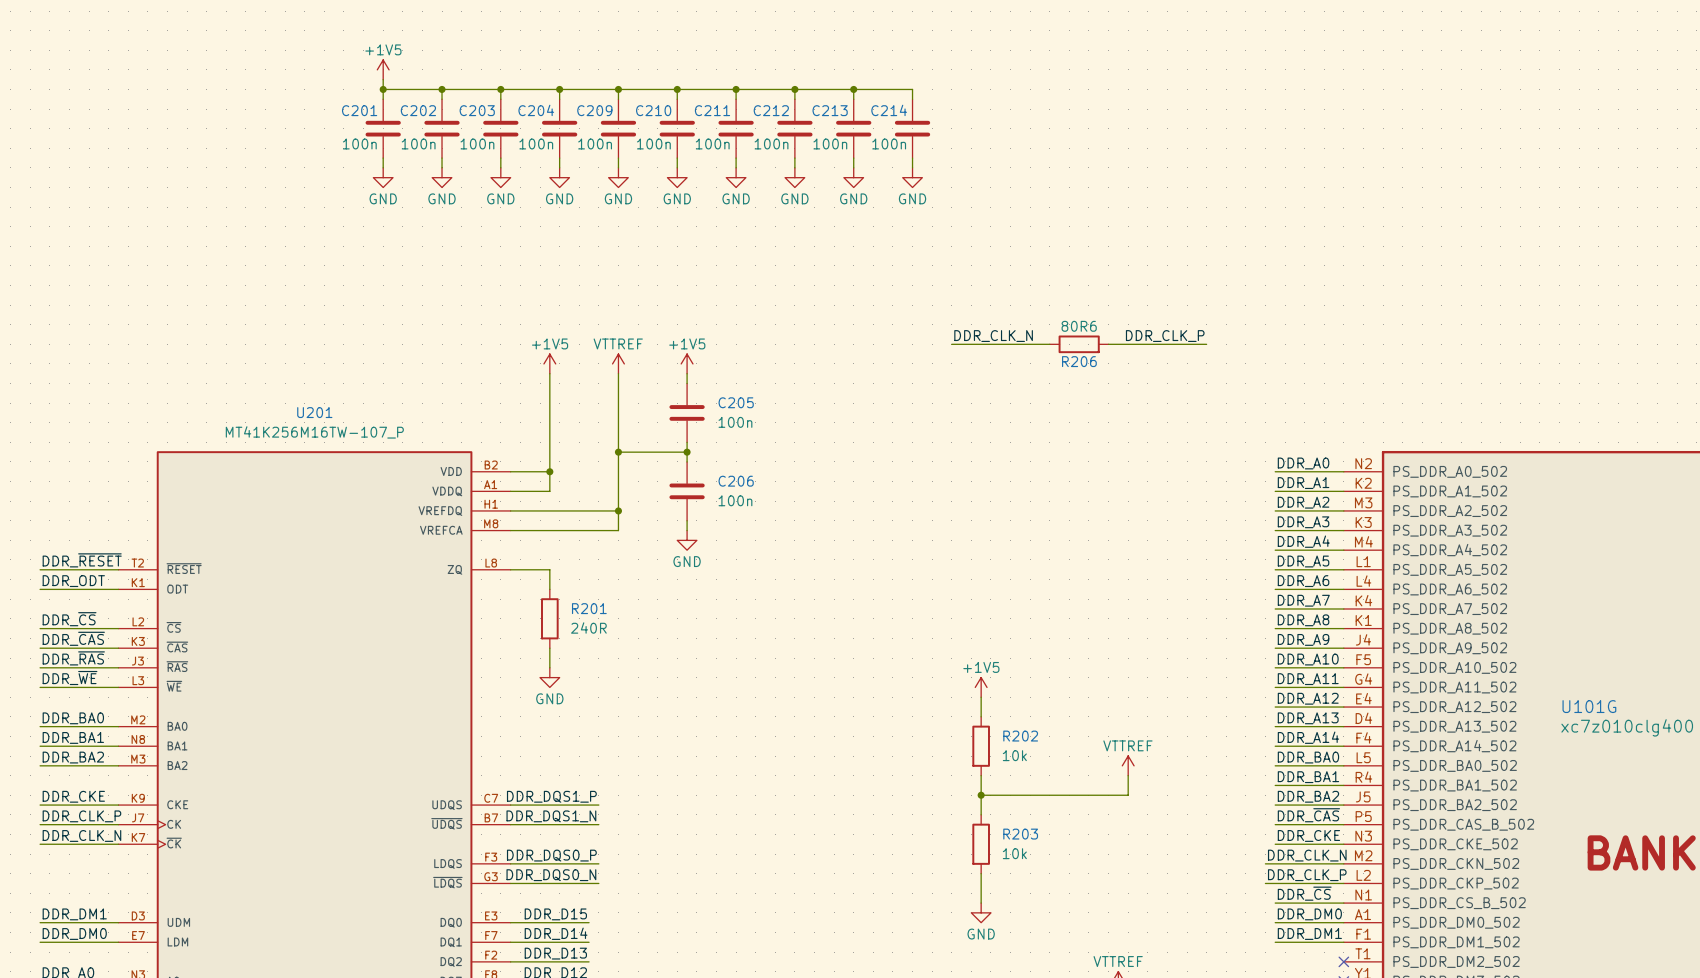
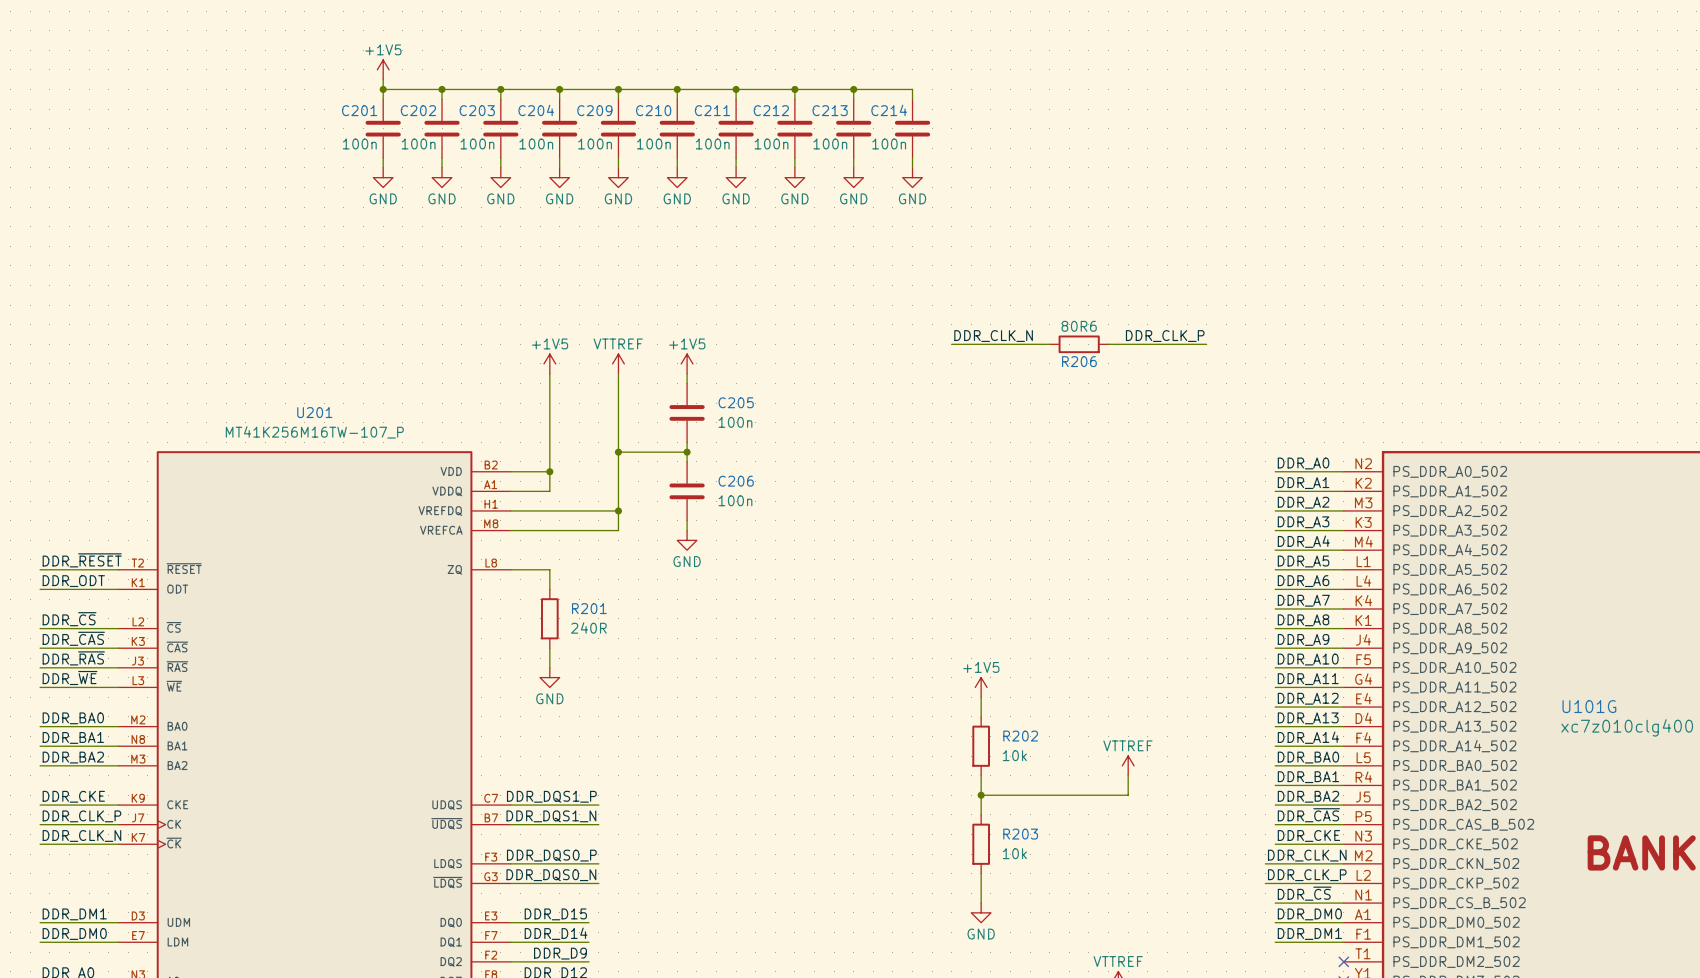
label: DDR_D13 (555, 953) -> DDR_D9 (560, 953)

